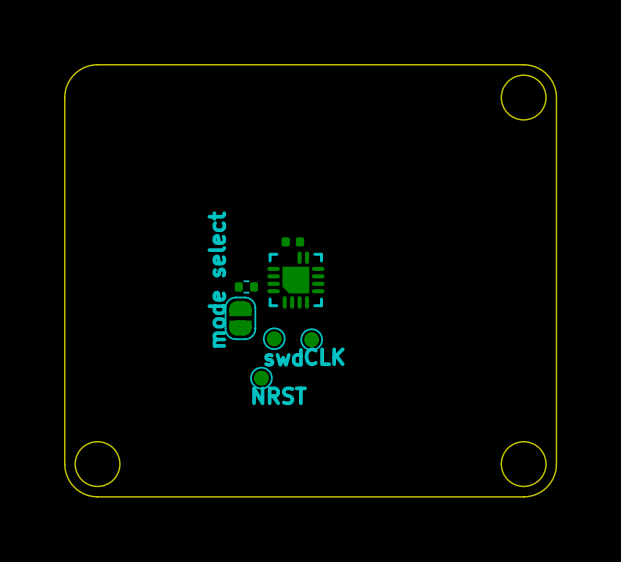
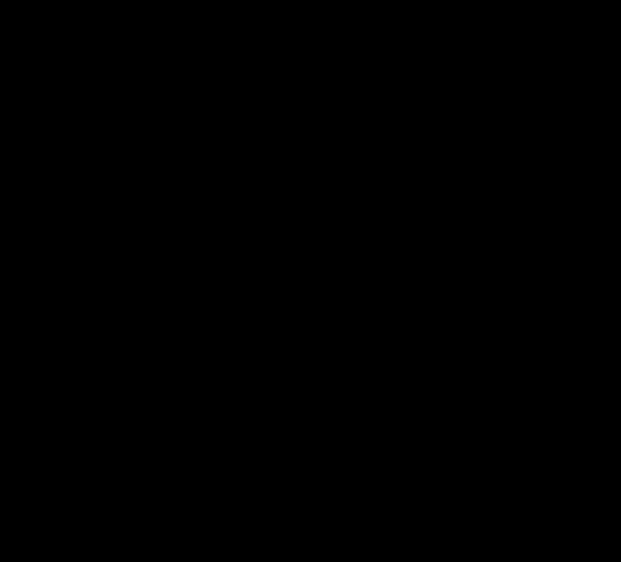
board edge: (523, 64) (97, 64) (86, 66) (74, 74) (68, 83) (64, 97) (64, 464) (66, 474) (74, 487) (86, 495) (97, 496) (523, 496) (537, 493) (546, 487) (554, 474) (556, 464) (556, 97) (553, 83) (546, 74) (537, 68) (523, 64) -> none
round board edge: [500, 74, 547, 121] -> none
part: (292, 241) -> none
text: mode select (216, 279) -> none
part: (295, 282) -> none
part: (246, 286) -> none
part: (240, 318) -> none
part: (274, 338) -> none
part: (311, 339) -> none
text: CLK (324, 356) -> none
text: swd (283, 357) -> none
part: (261, 378) -> none
text: NRST (279, 395) -> none
round board edge: [74, 441, 121, 487] -> none
round board edge: [500, 441, 547, 487] -> none

